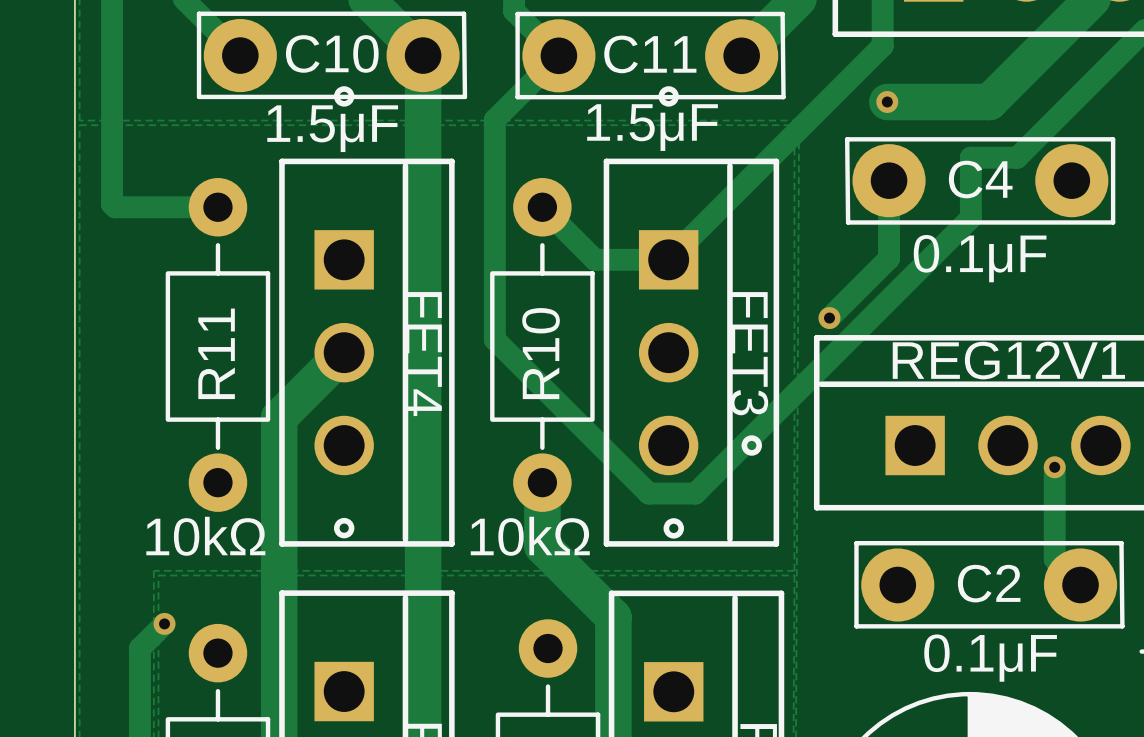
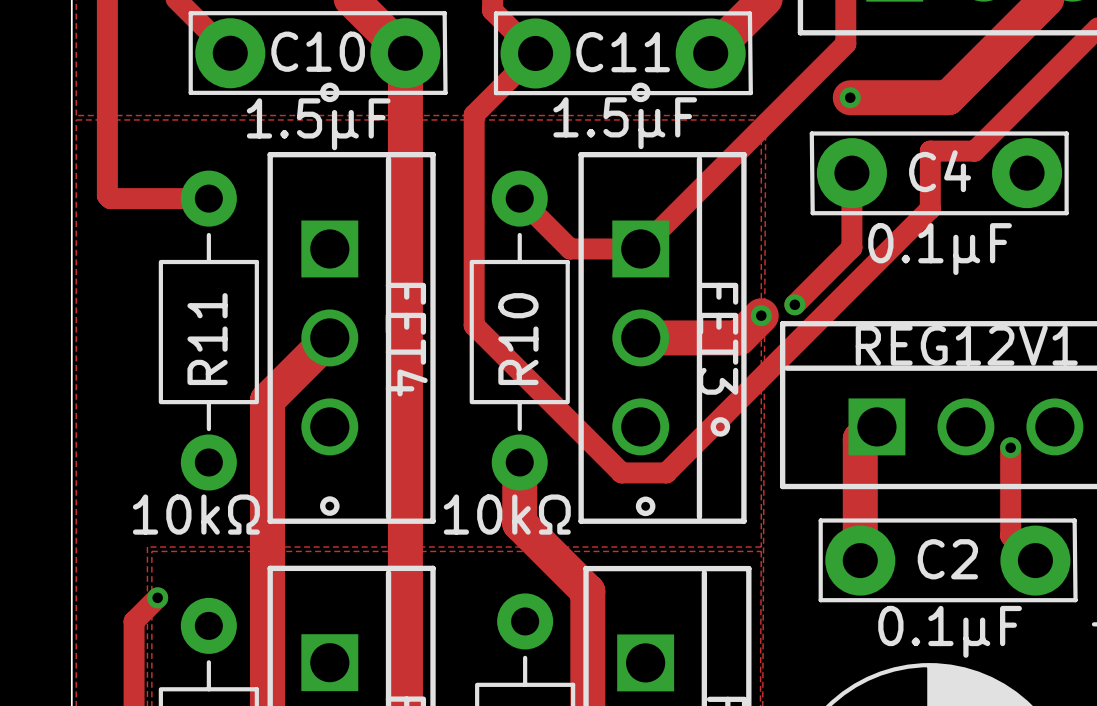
track: none -> (761, 315) (739, 337) (640, 337)
via: none -> (761, 315)
track: none -> (876, 426) (872, 426) (860, 439) (860, 560)

